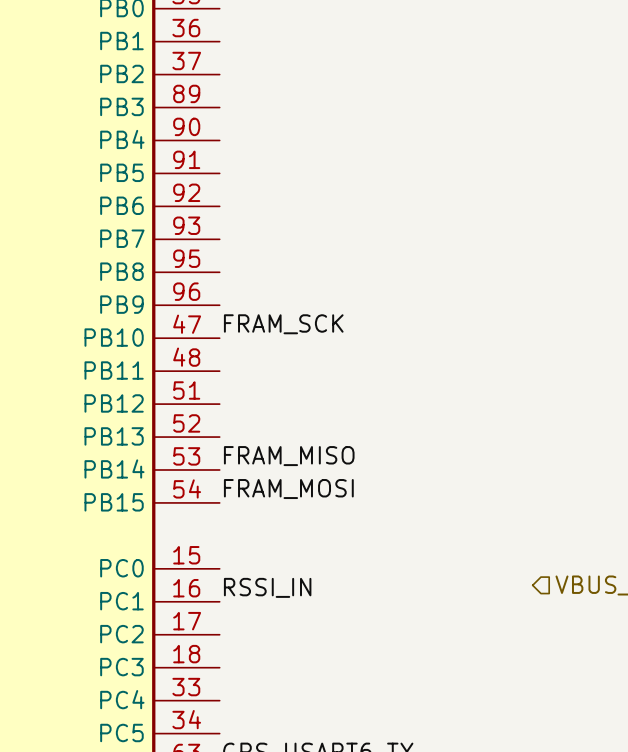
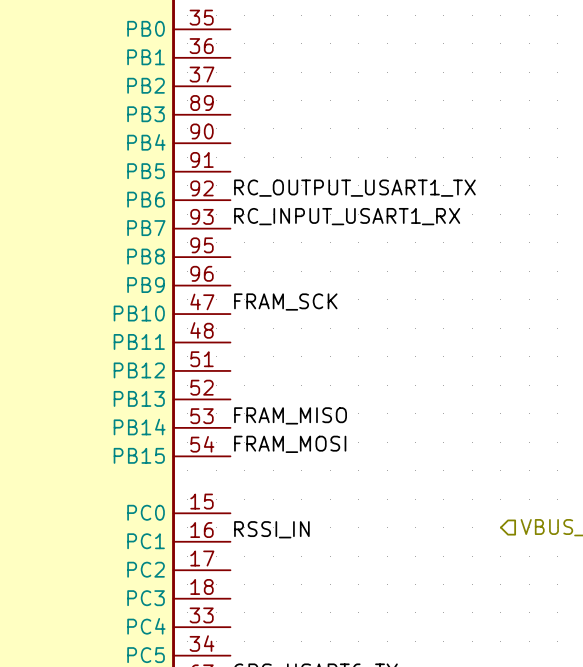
label: none -> RC_OUTPUT_USART1_TX (354, 188)
label: none -> RC_INPUT_USART1_RX (347, 216)

